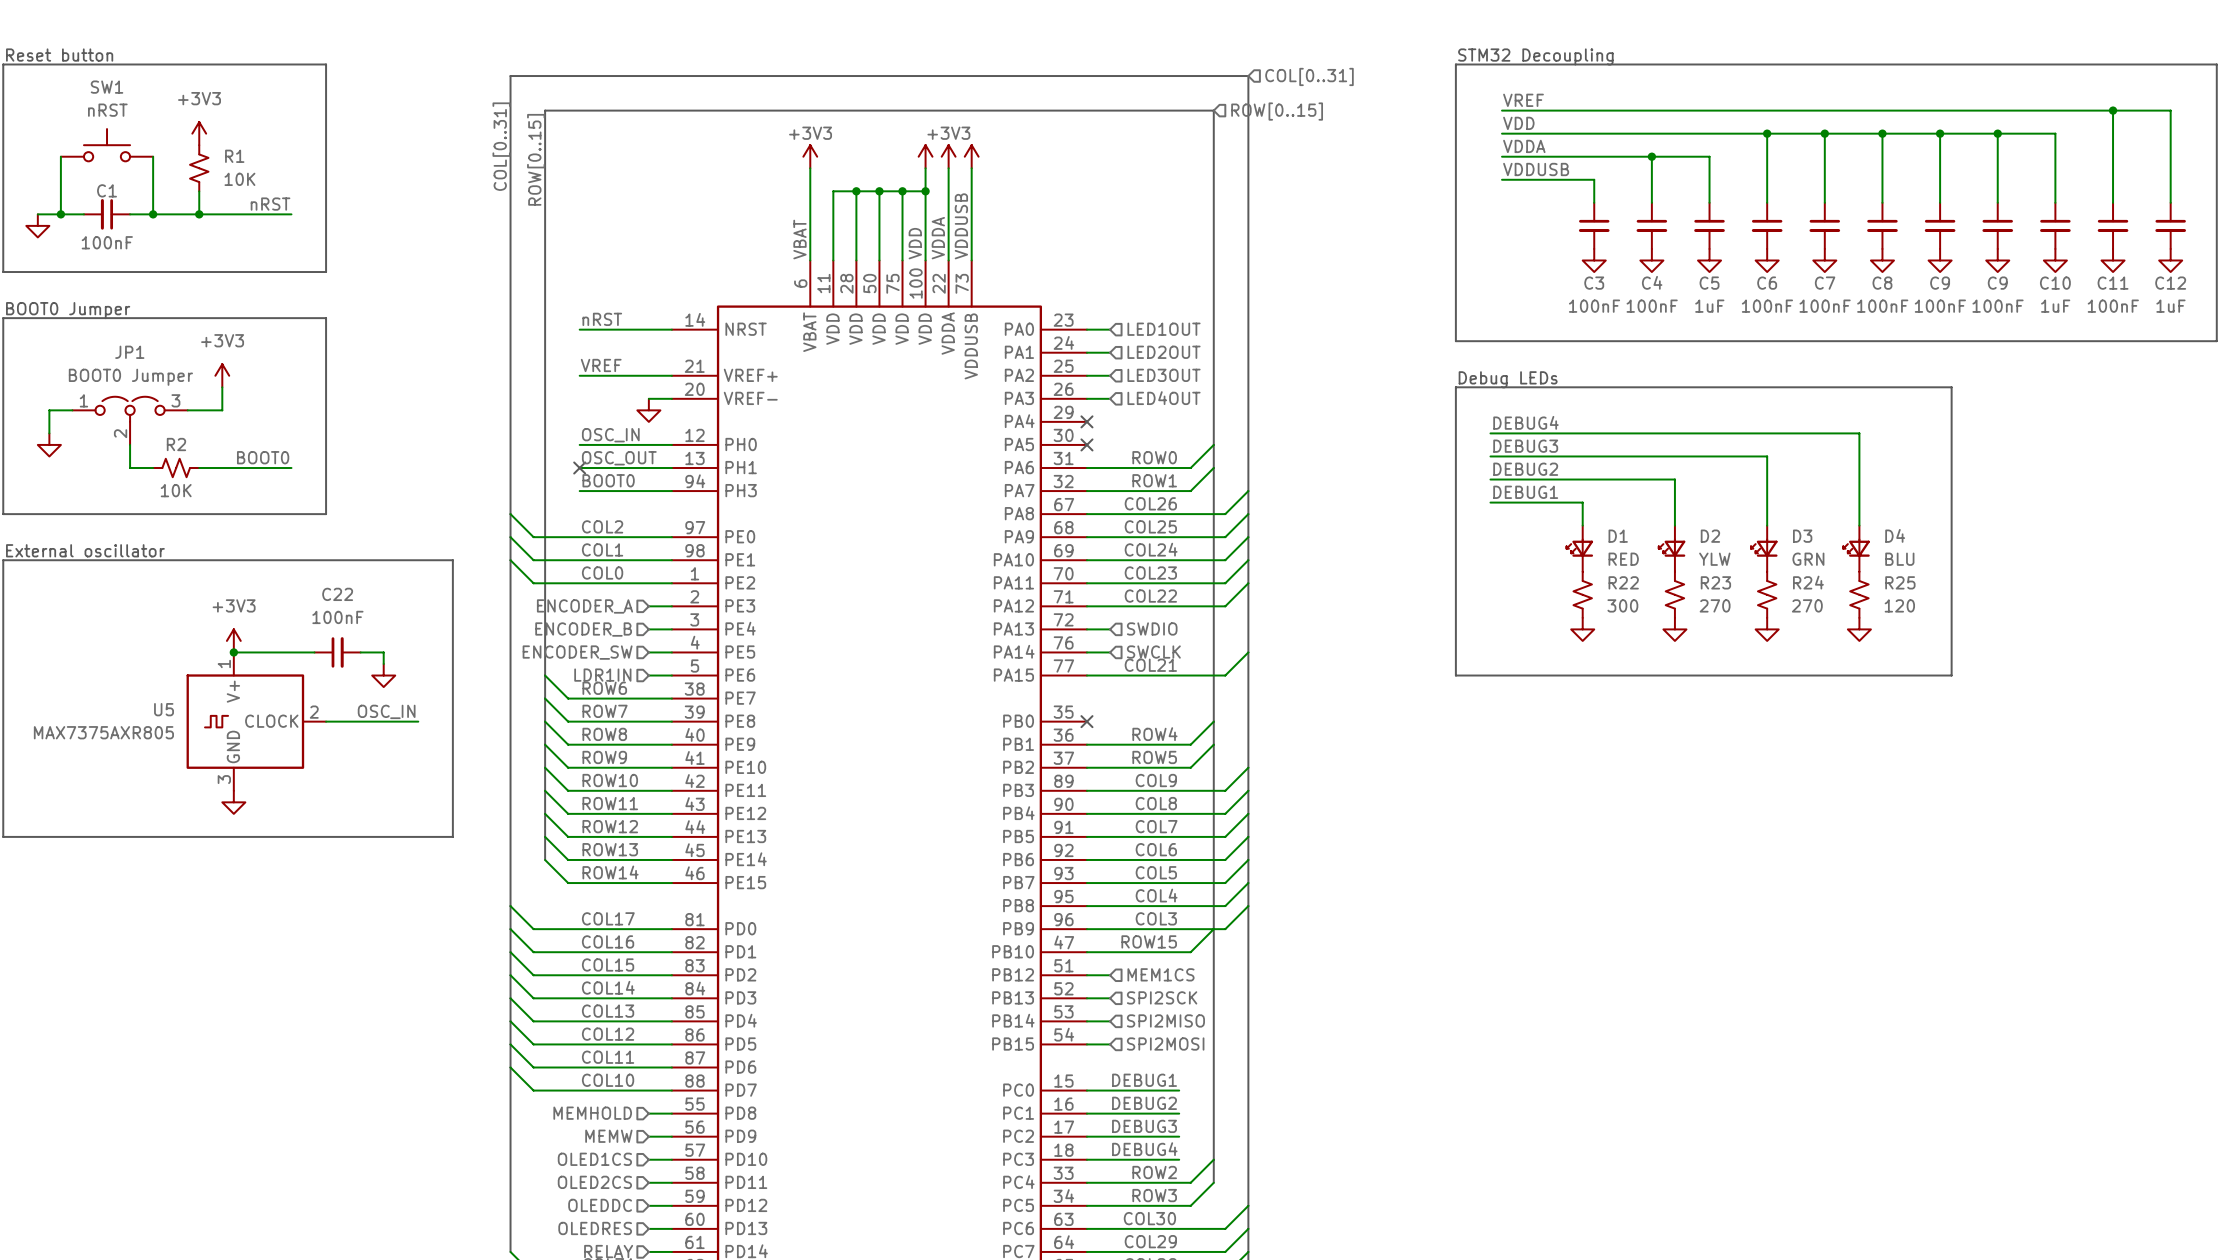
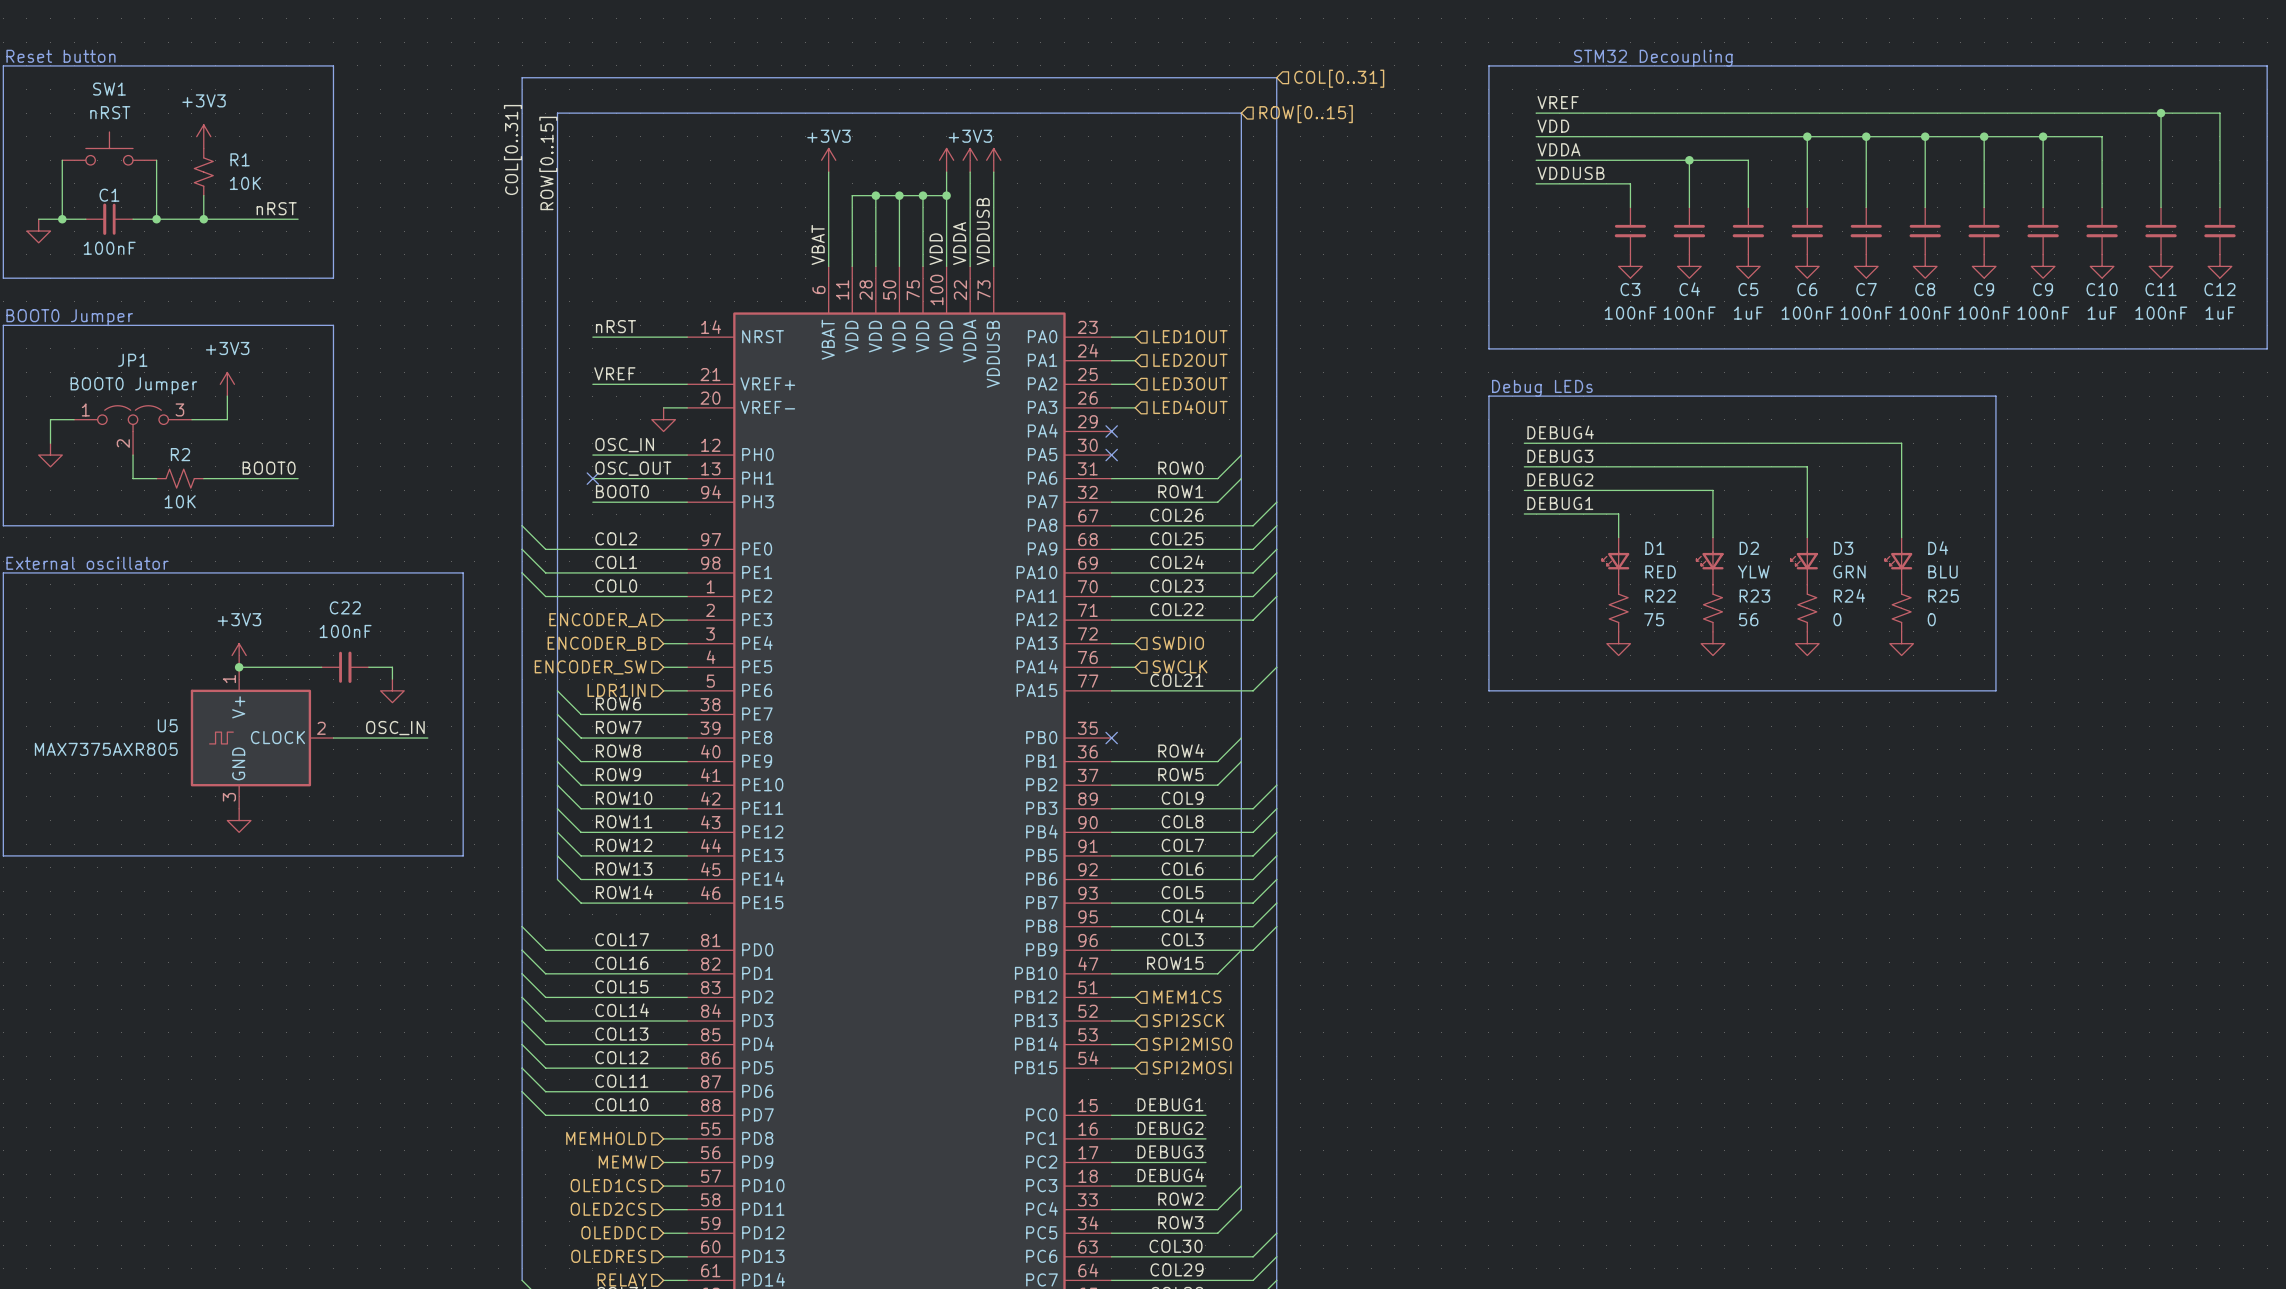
text position: STM32 Decoupling (1535, 56) -> STM32 Decoupling (1653, 58)
R22 value: 300 (1622, 605) -> 75 (1654, 619)
R23 value: 270 (1715, 605) -> 56 (1748, 619)
R24 value: 270 (1807, 605) -> 0 (1837, 619)
R25 value: 120 (1899, 605) -> 0 (1931, 619)

